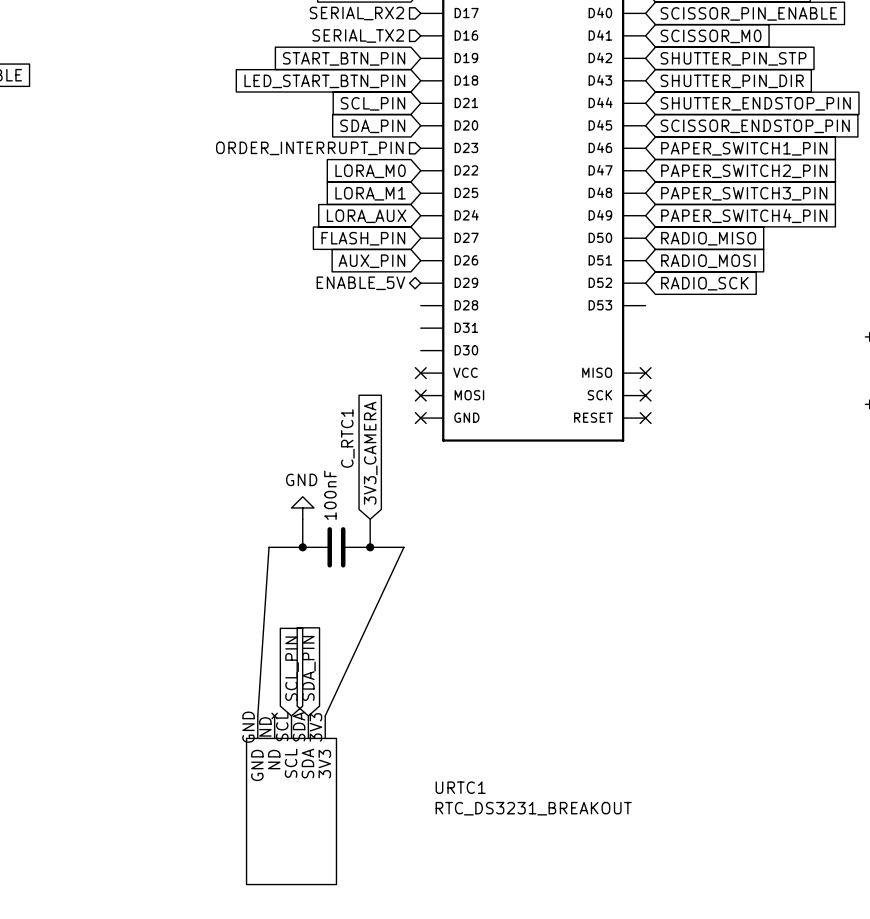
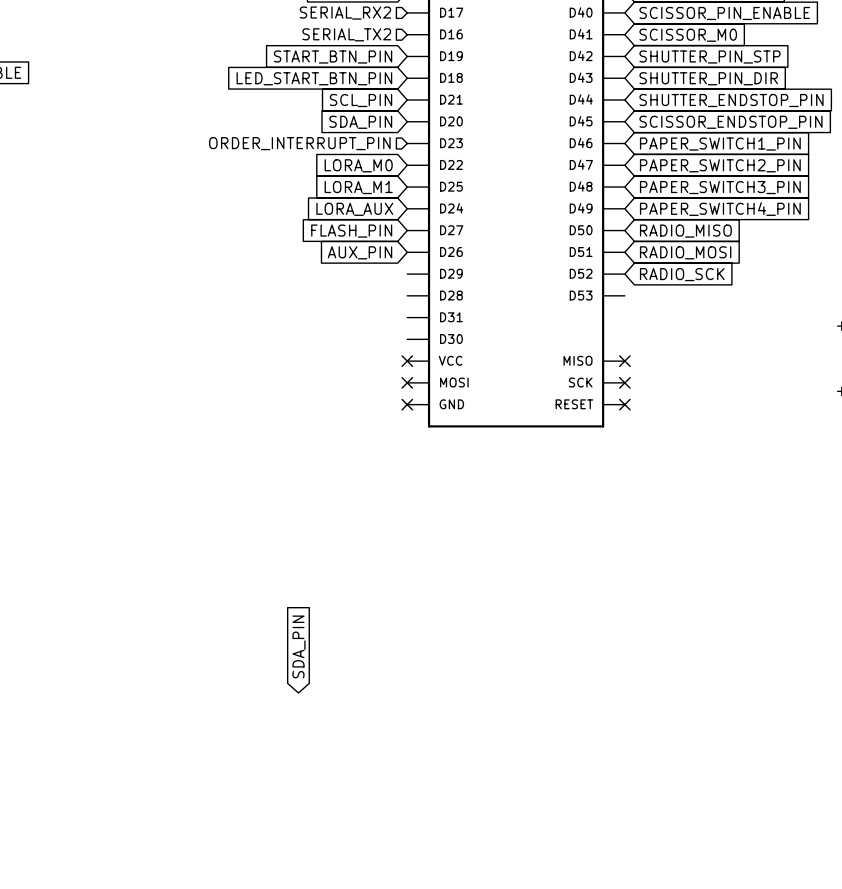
hierarchical label: ENABLE_5V (360, 283) -> none
global label: 3V3_CAMERA (370, 453) -> none
power symbol: GND (302, 507) -> none
wire: (302, 519) (302, 547) (269, 547) (257, 715) -> none
wire: (370, 519) (370, 547) (403, 547) (325, 715) -> none
junction: (302, 547) -> none
C_RTC1: 100nF (336, 547) -> none
junction: (370, 547) -> none
global label: SCL_PIN (292, 668) -> none
URTC1: RTC_DS3231_BREAKOUT (291, 798) -> none

